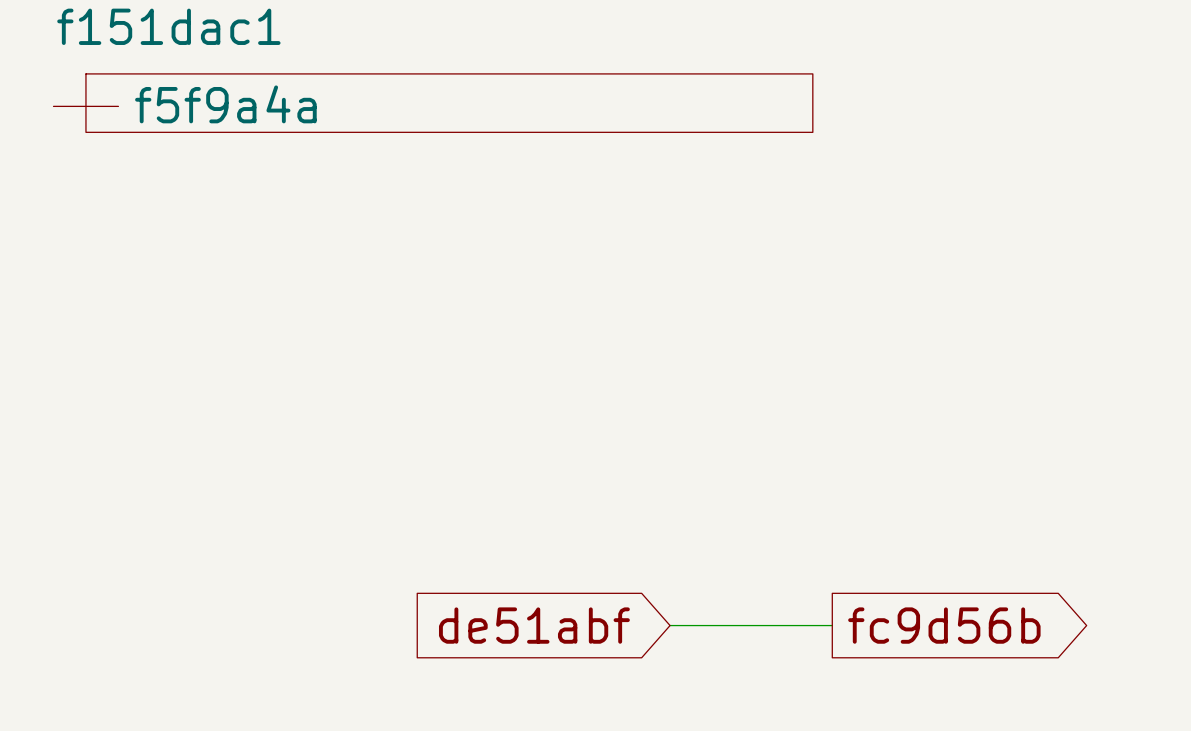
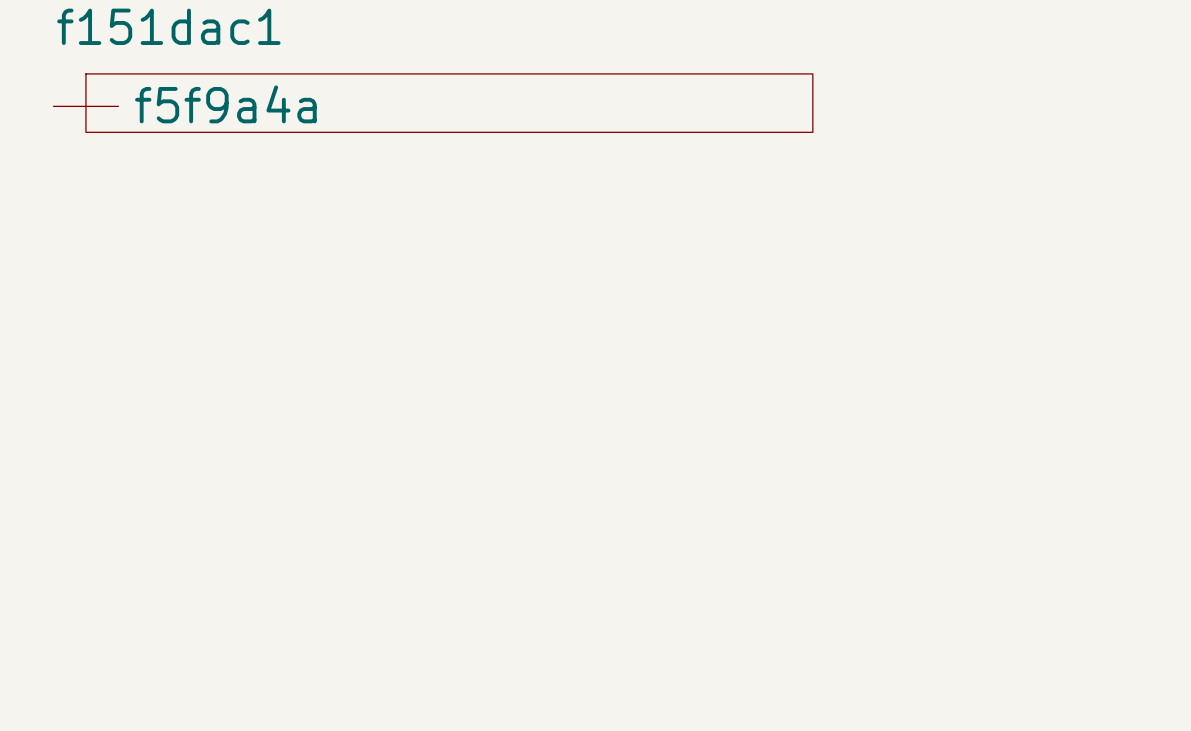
global label: de51abf (534, 625) -> none
wire: (670, 625) (832, 625) -> none
global label: fc9d56b (944, 625) -> none

